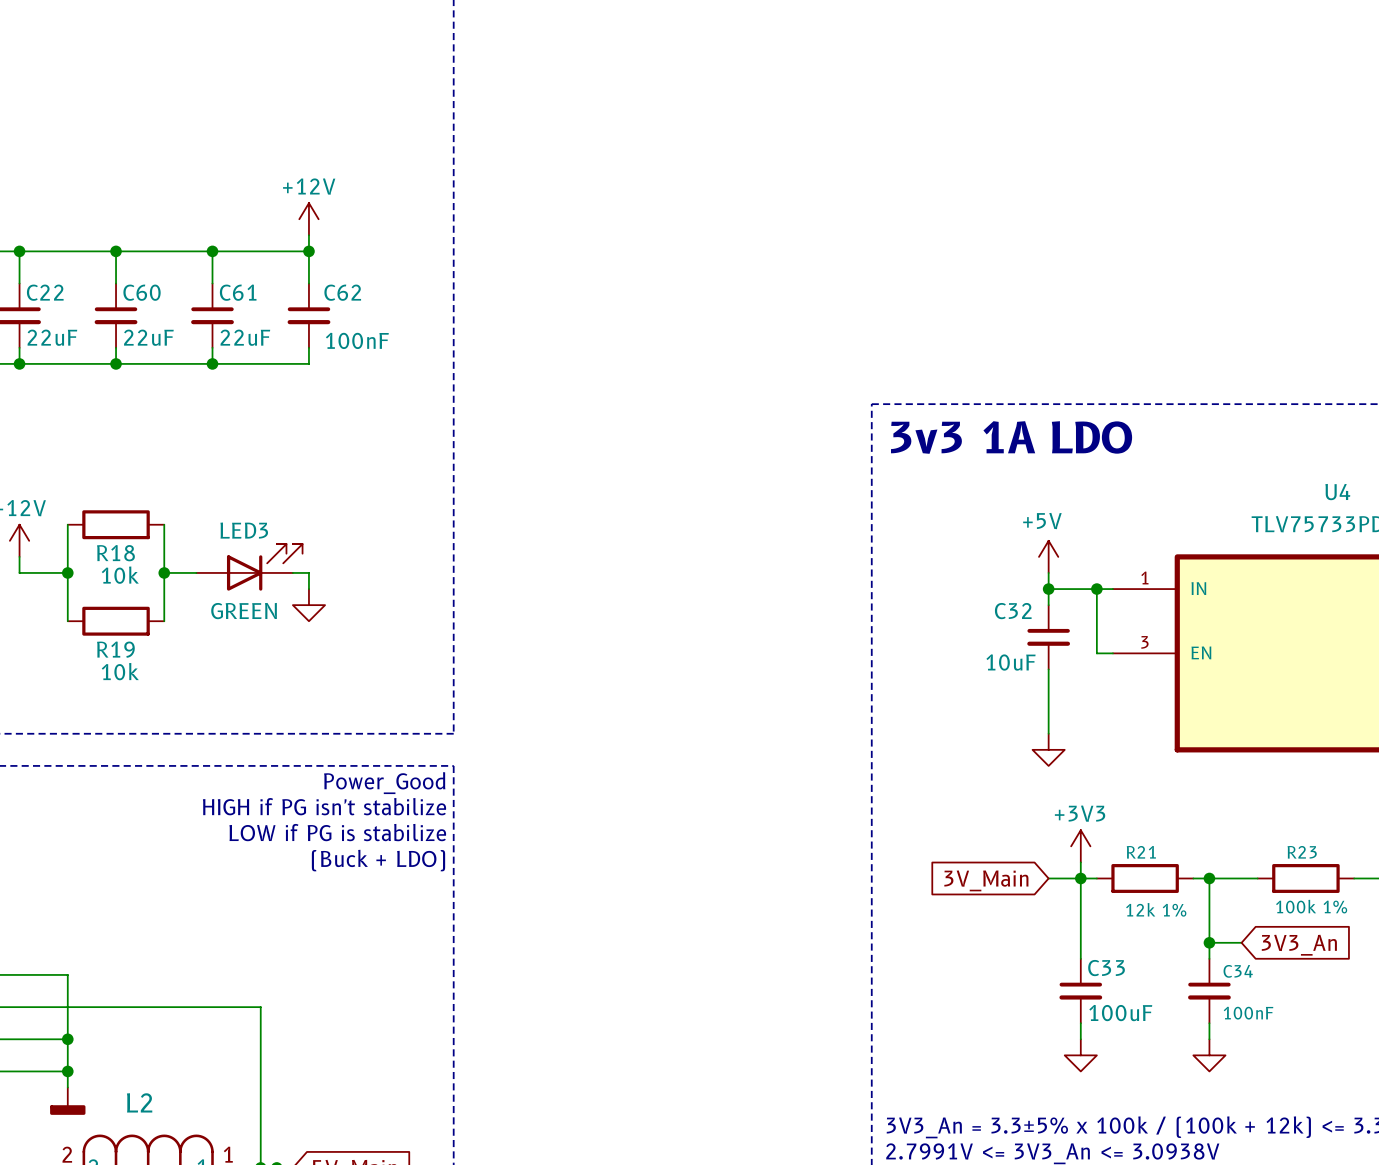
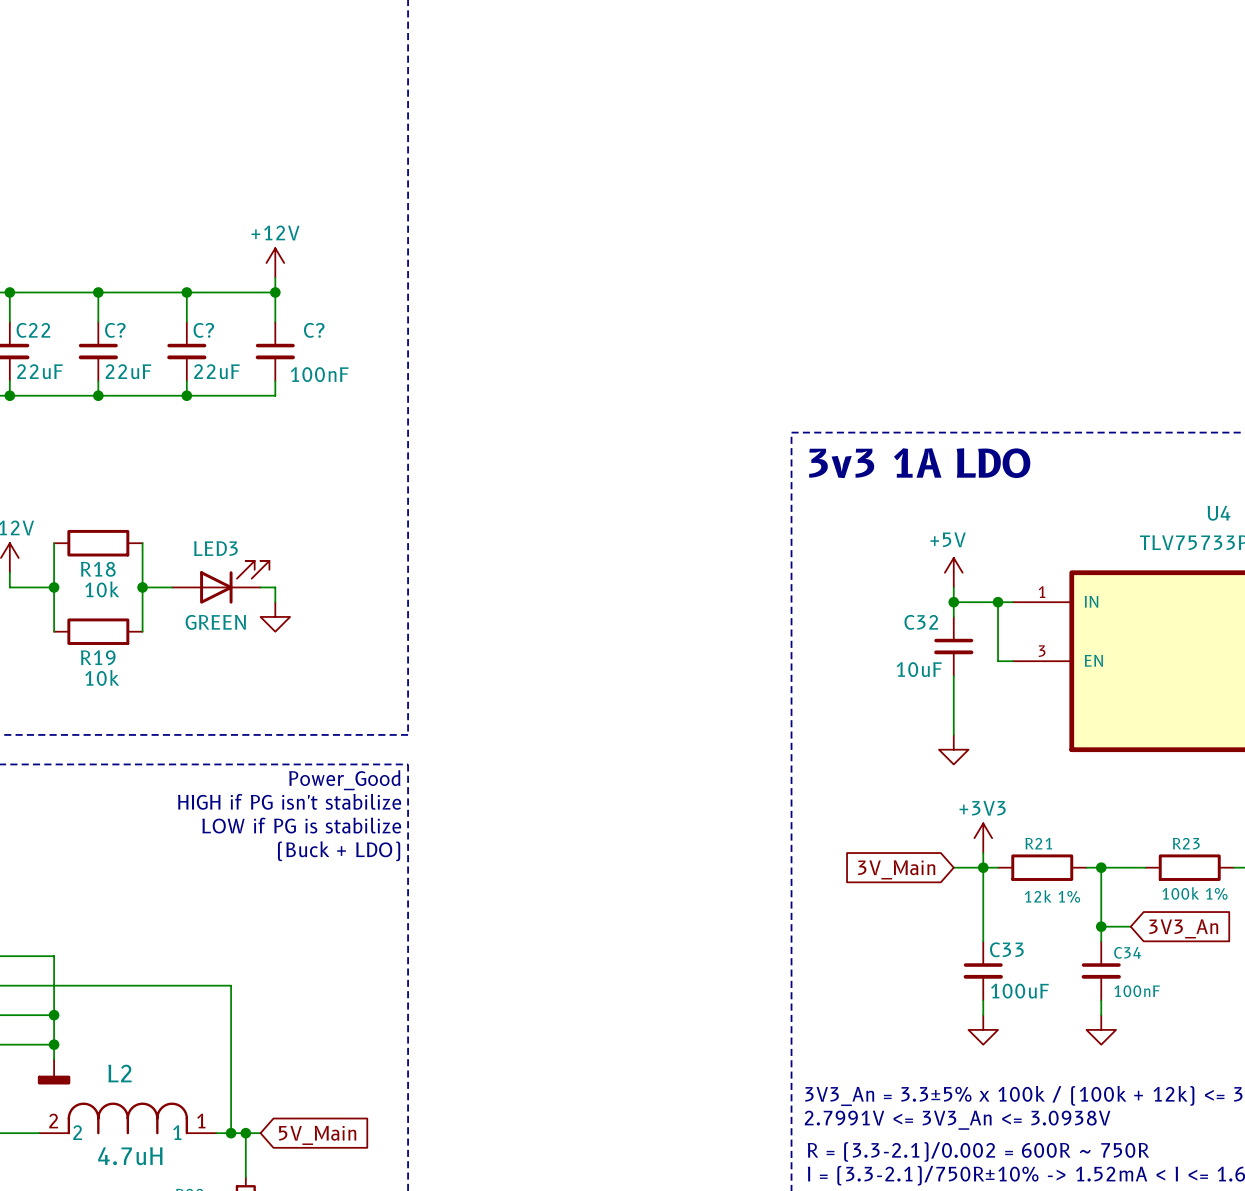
C60 name: C60 (142, 292) -> C? (115, 330)
C61 name: C61 (238, 292) -> C? (203, 330)
C62 name: C62 (342, 292) -> C? (314, 330)

